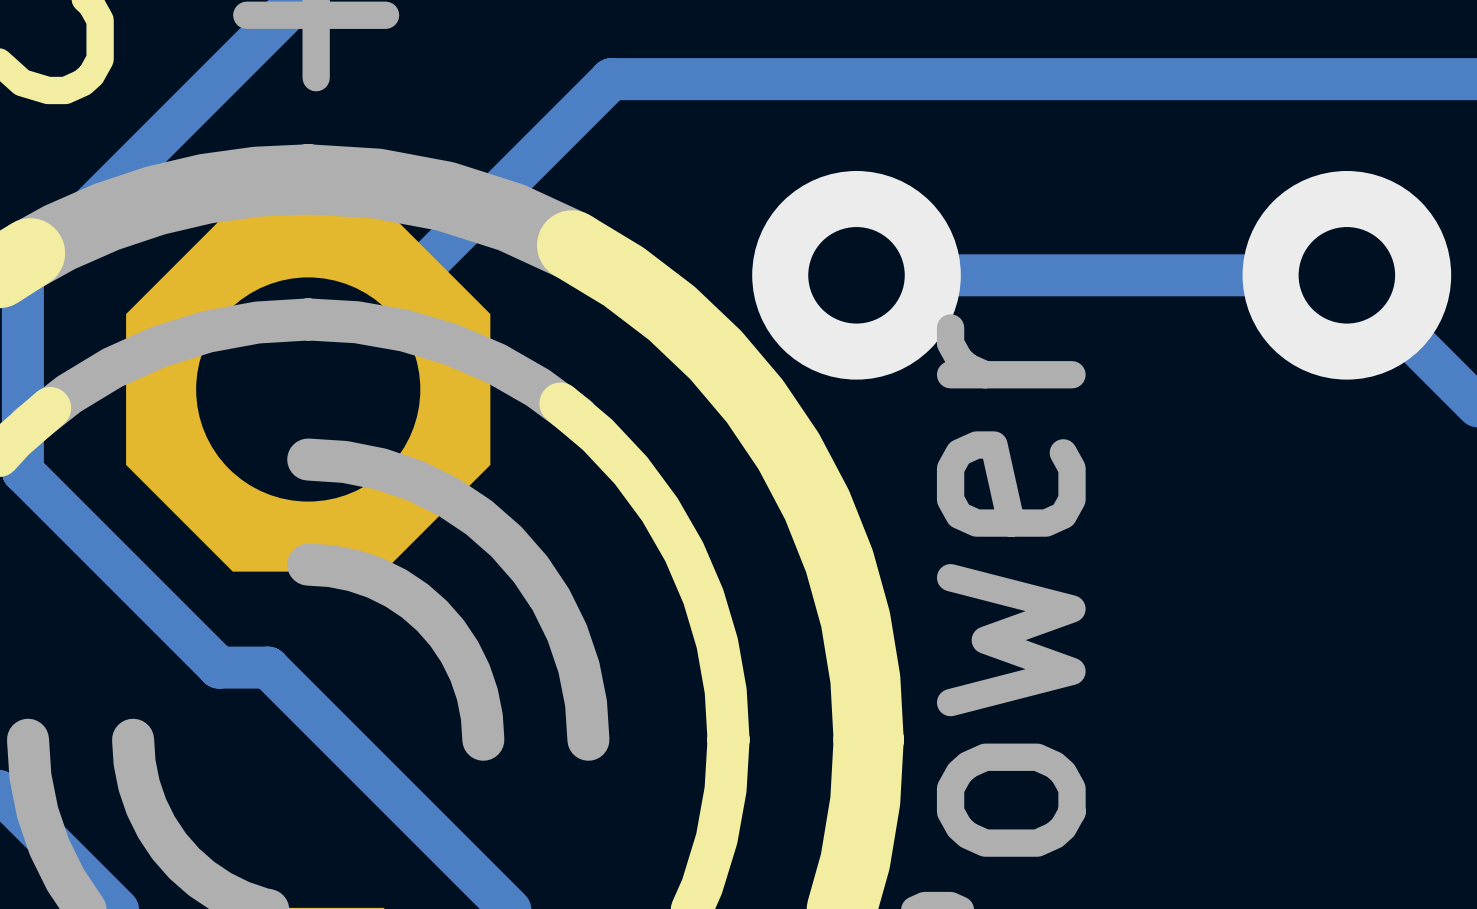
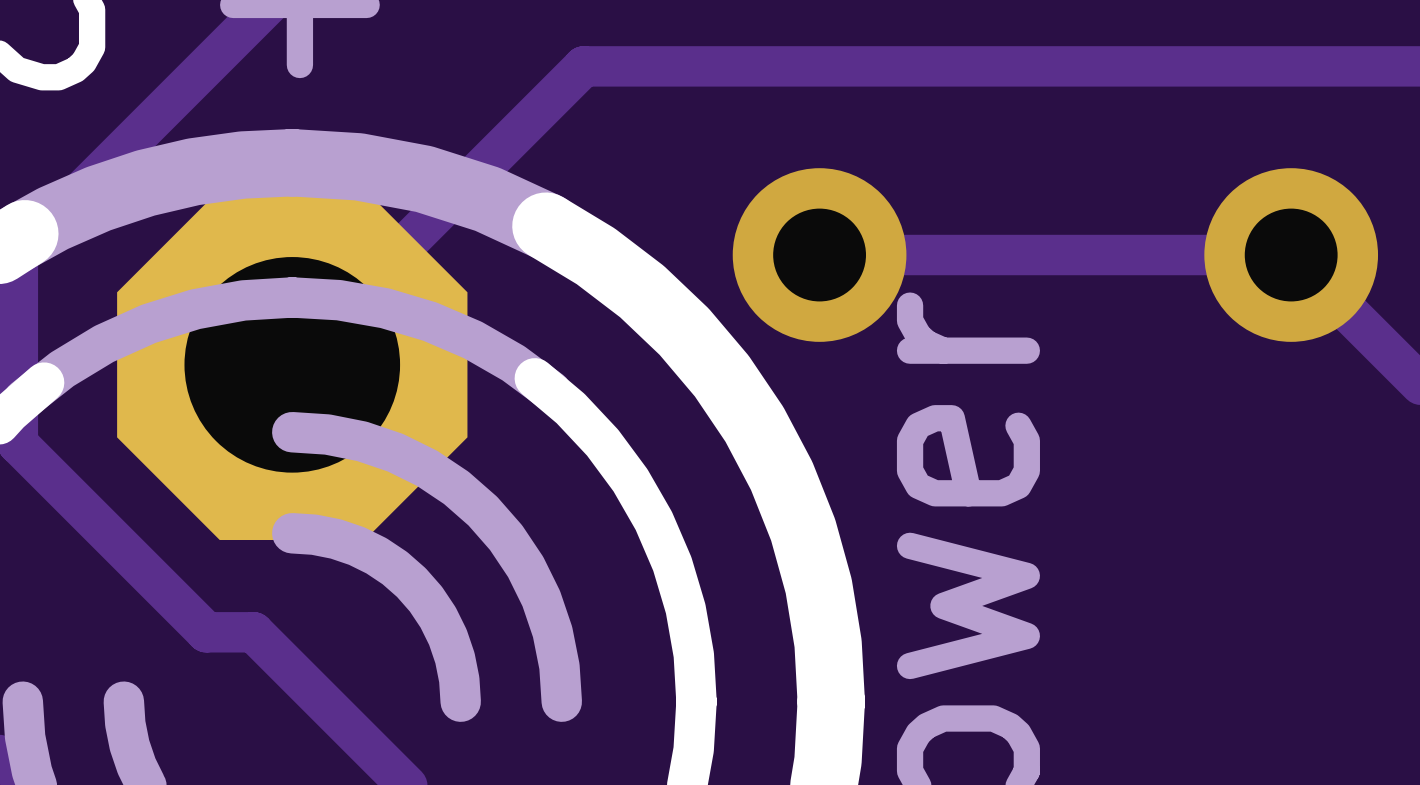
via size: [752, 171, 961, 380] -> [732, 168, 907, 342]
via size: [1242, 171, 1452, 380] -> [1204, 168, 1379, 342]

